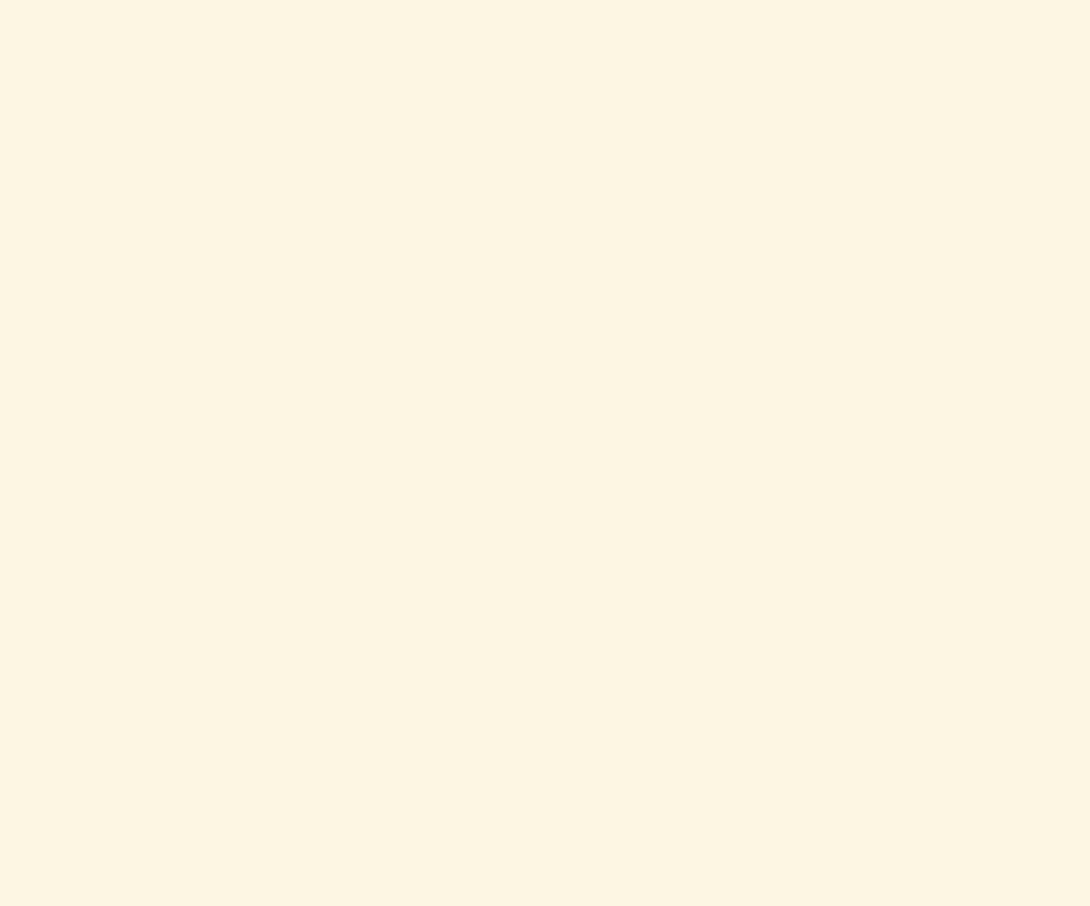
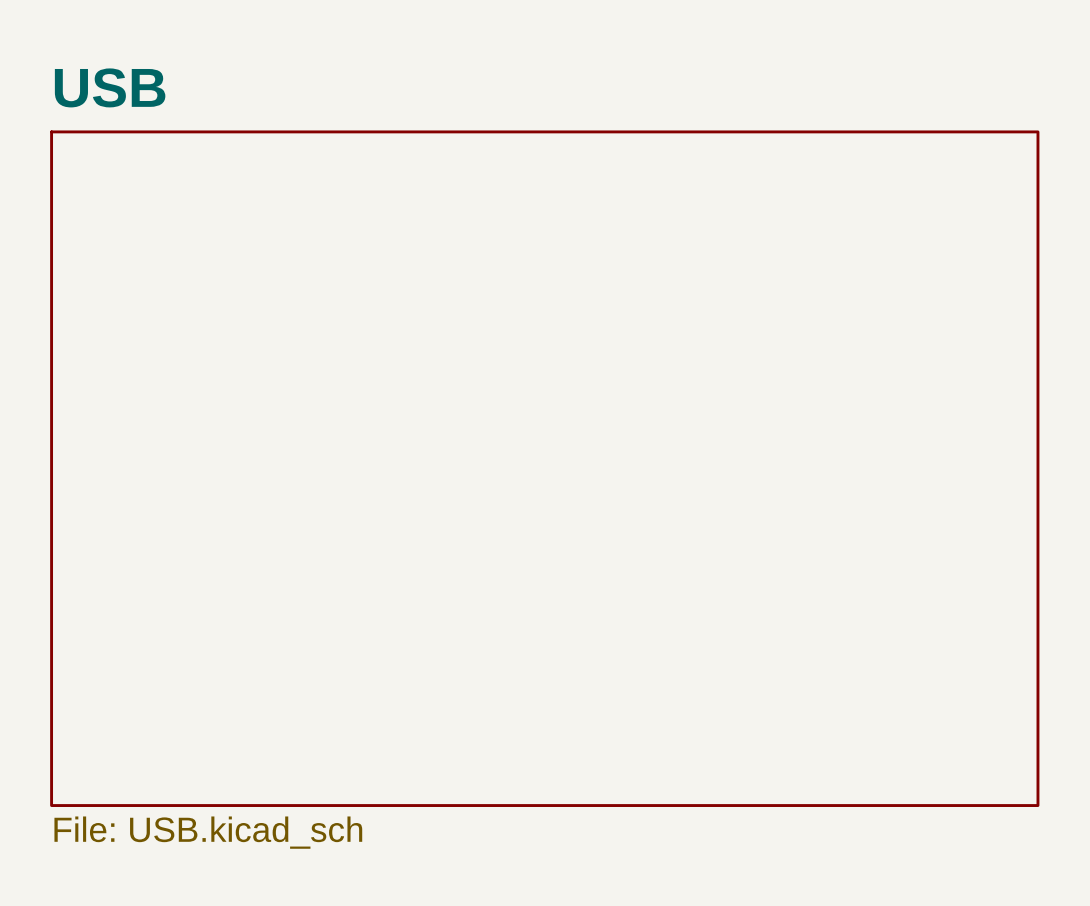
sheet USB: none -> File: USB.kicad_sch (544, 468)

